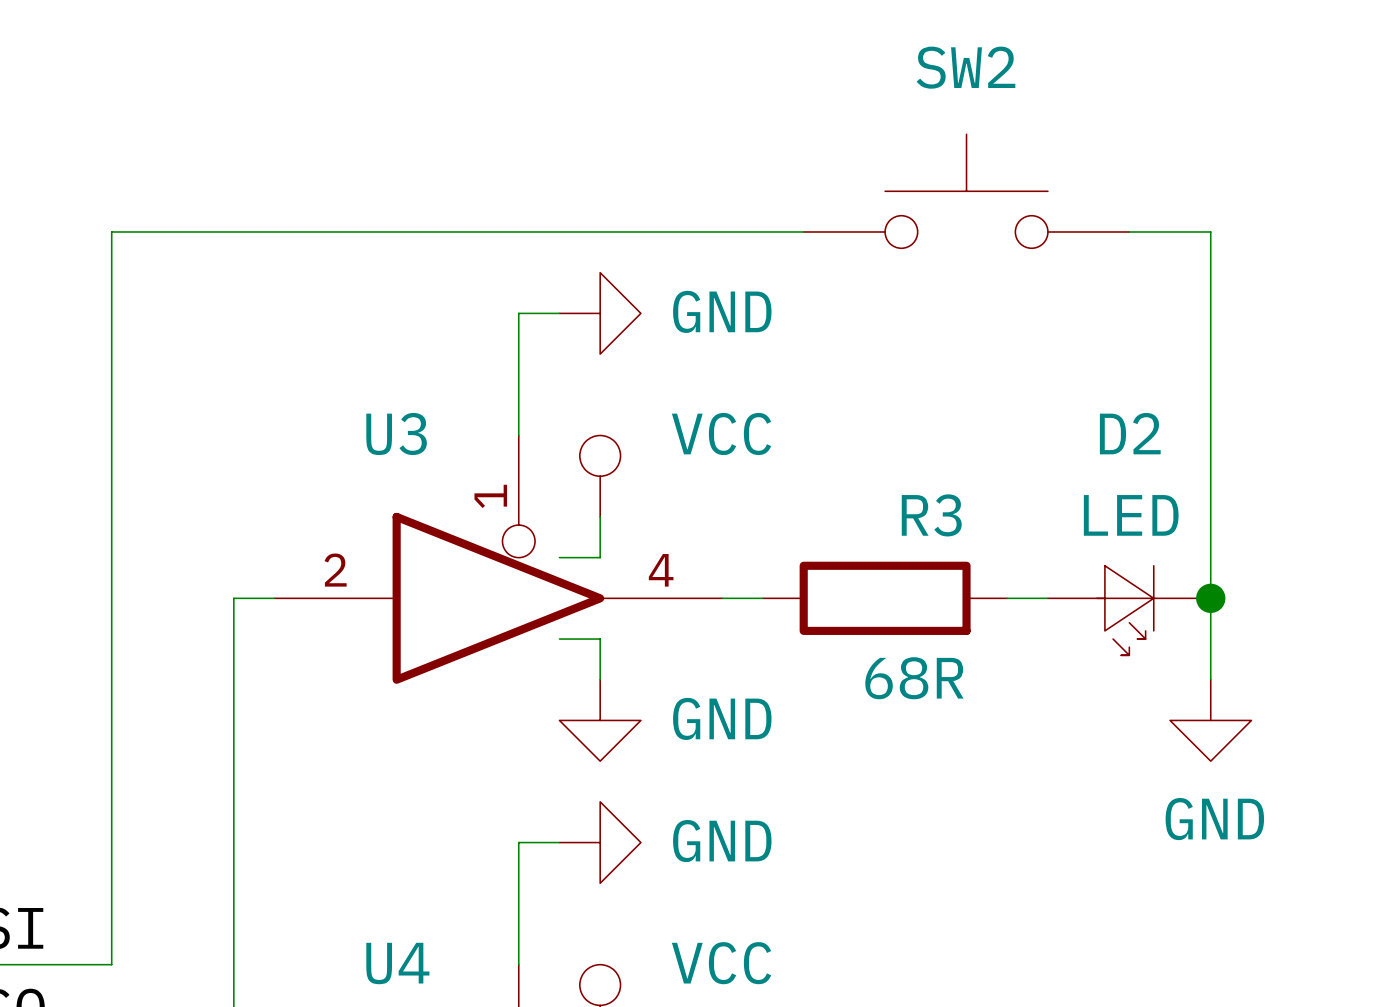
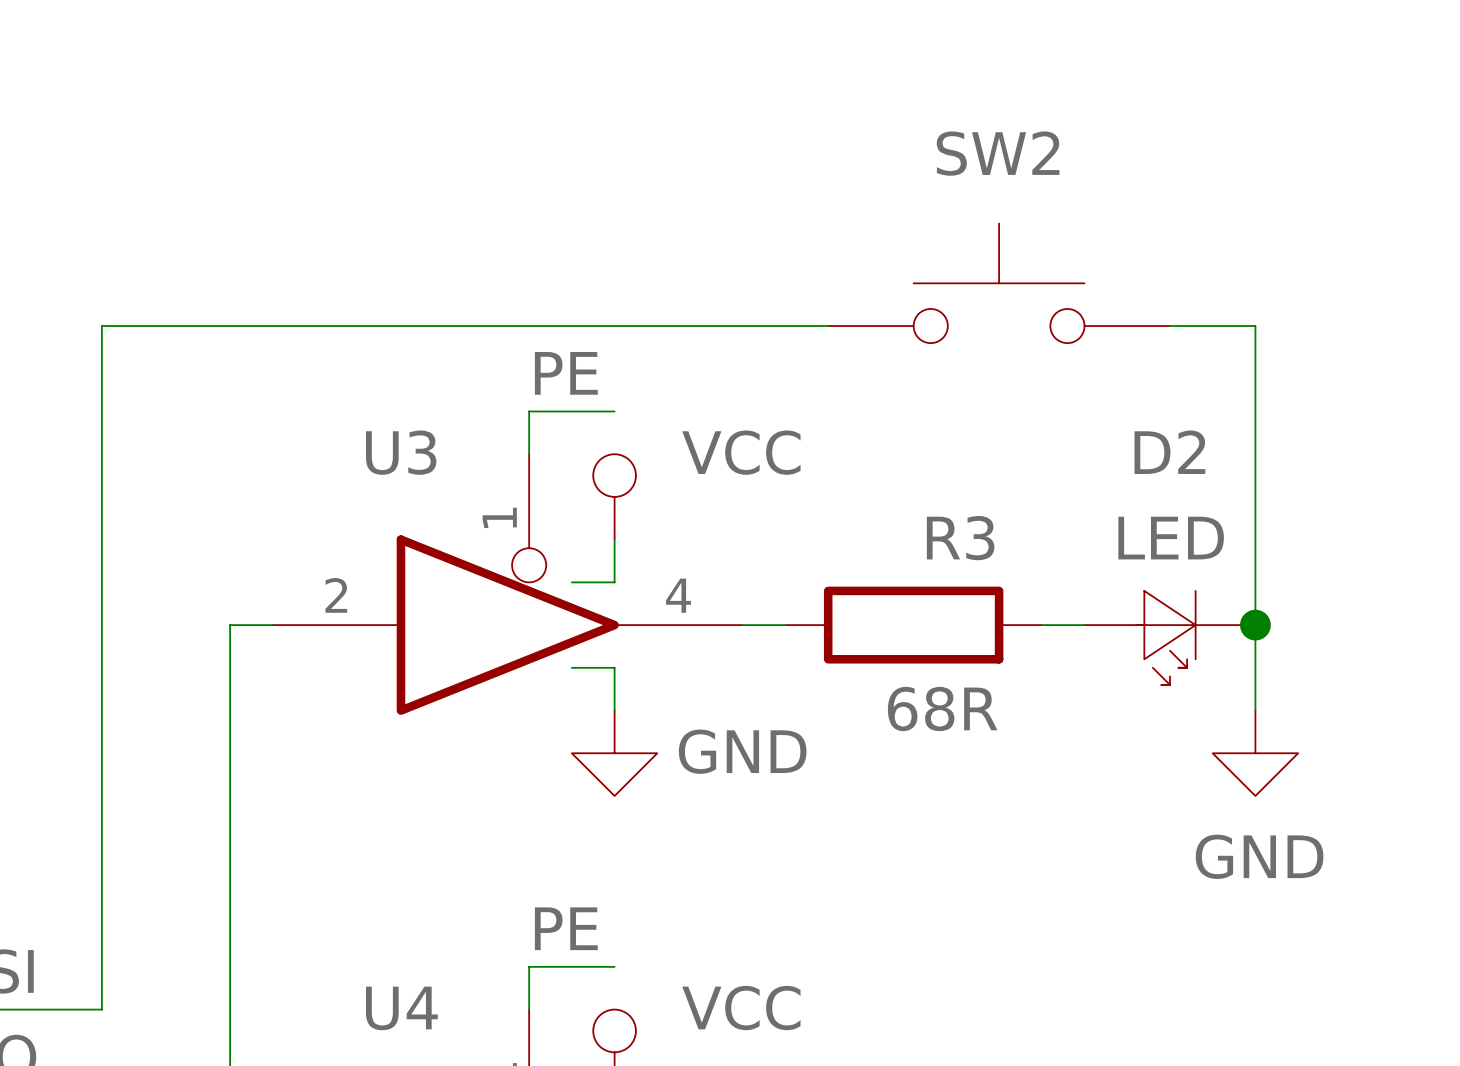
SW2 position: (966, 191) -> (999, 283)
wire: (803, 231) (111, 231) (111, 313) -> (529, 326) (101, 326)
wire: (1129, 231) (1210, 231) (1210, 313) -> (1169, 326) (1255, 326)
wire: (518, 313) (518, 394) -> (614, 411) (529, 411)
wire: none -> (571, 326) (828, 326)
power symbol: GND (600, 313) -> none
label: none -> PE (566, 373)
wire: (559, 842) (518, 842) (518, 923) -> (614, 966) (529, 966)
power symbol: GND (600, 842) -> none
label: none -> PE (566, 928)

